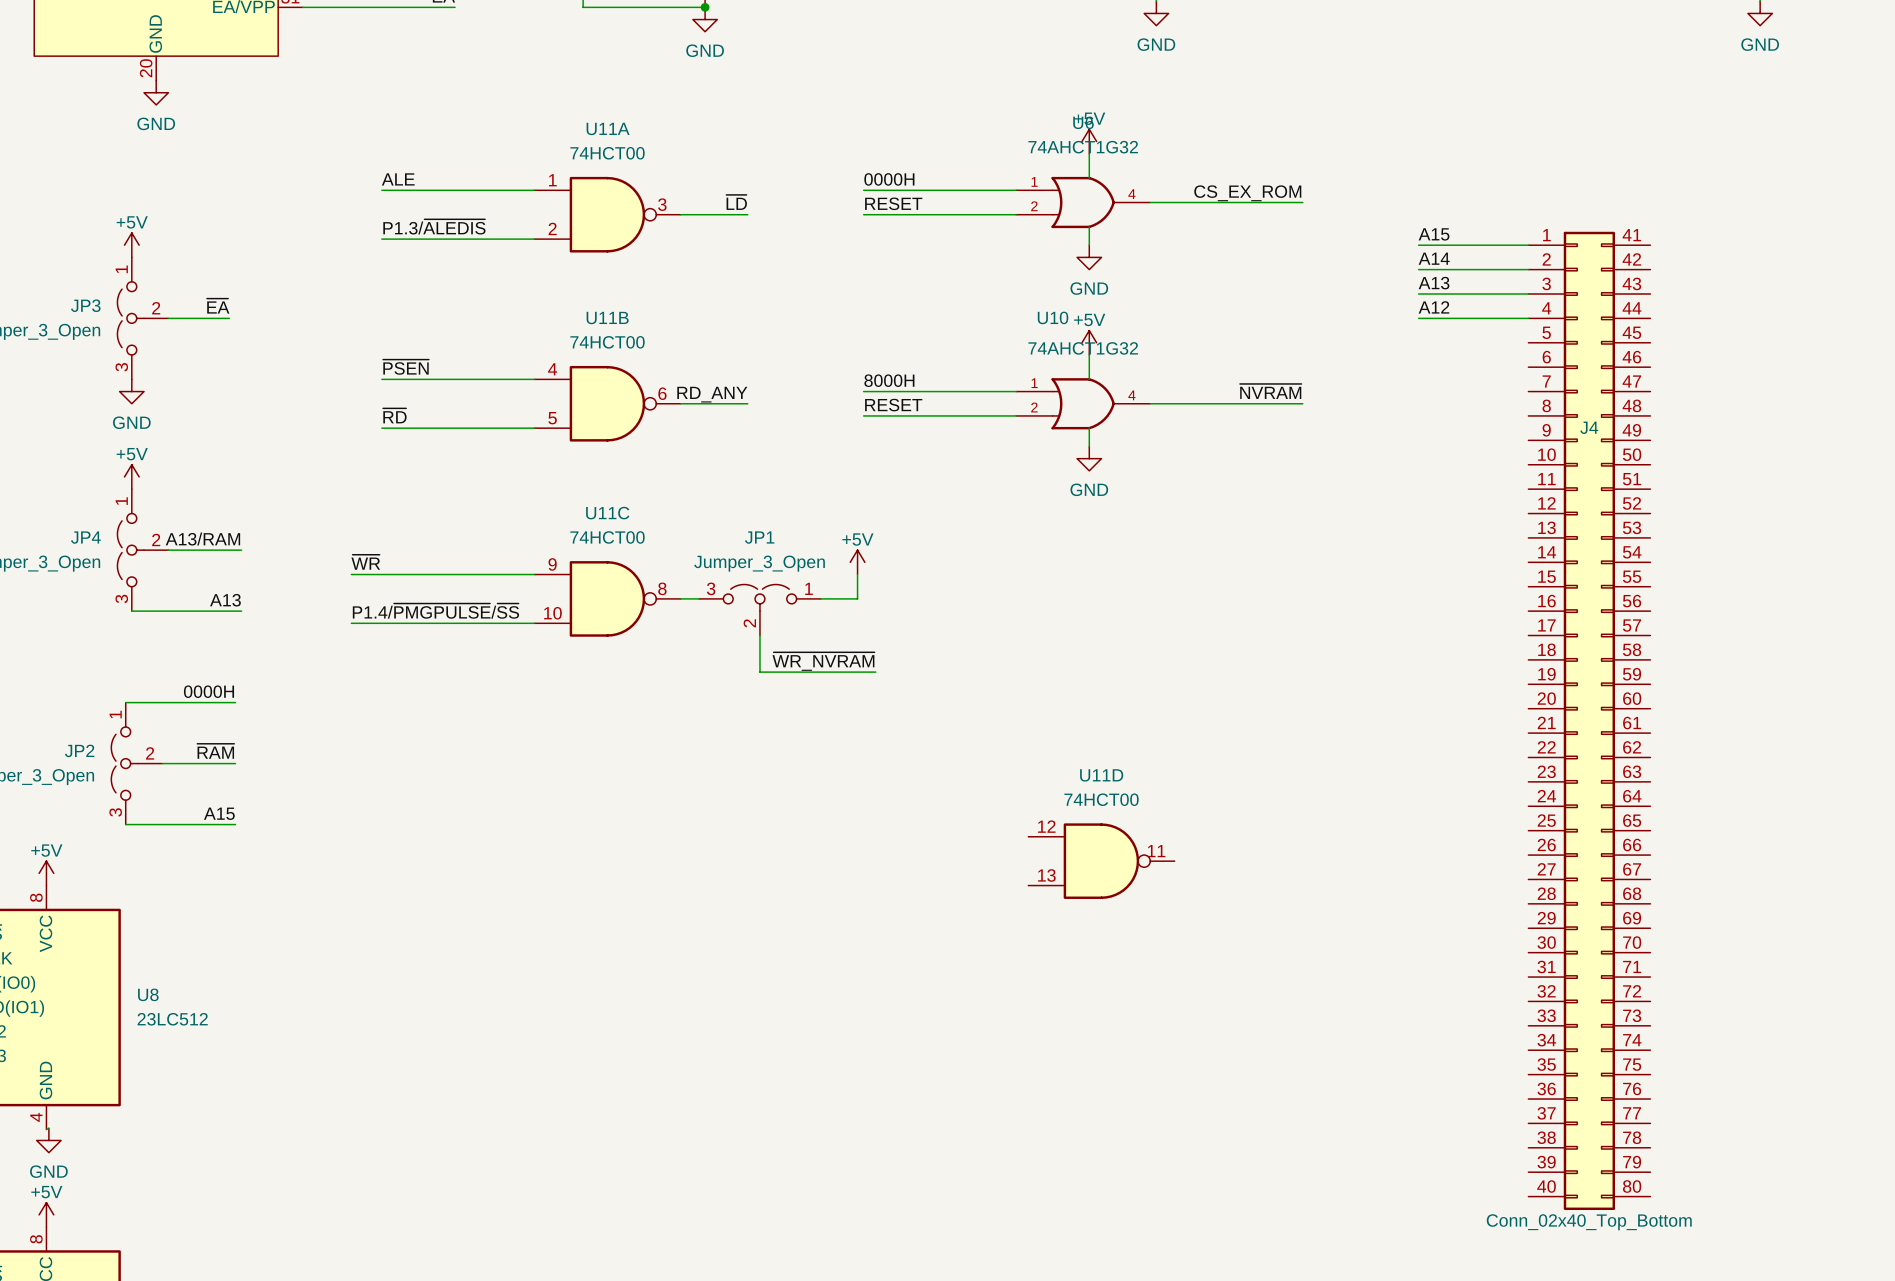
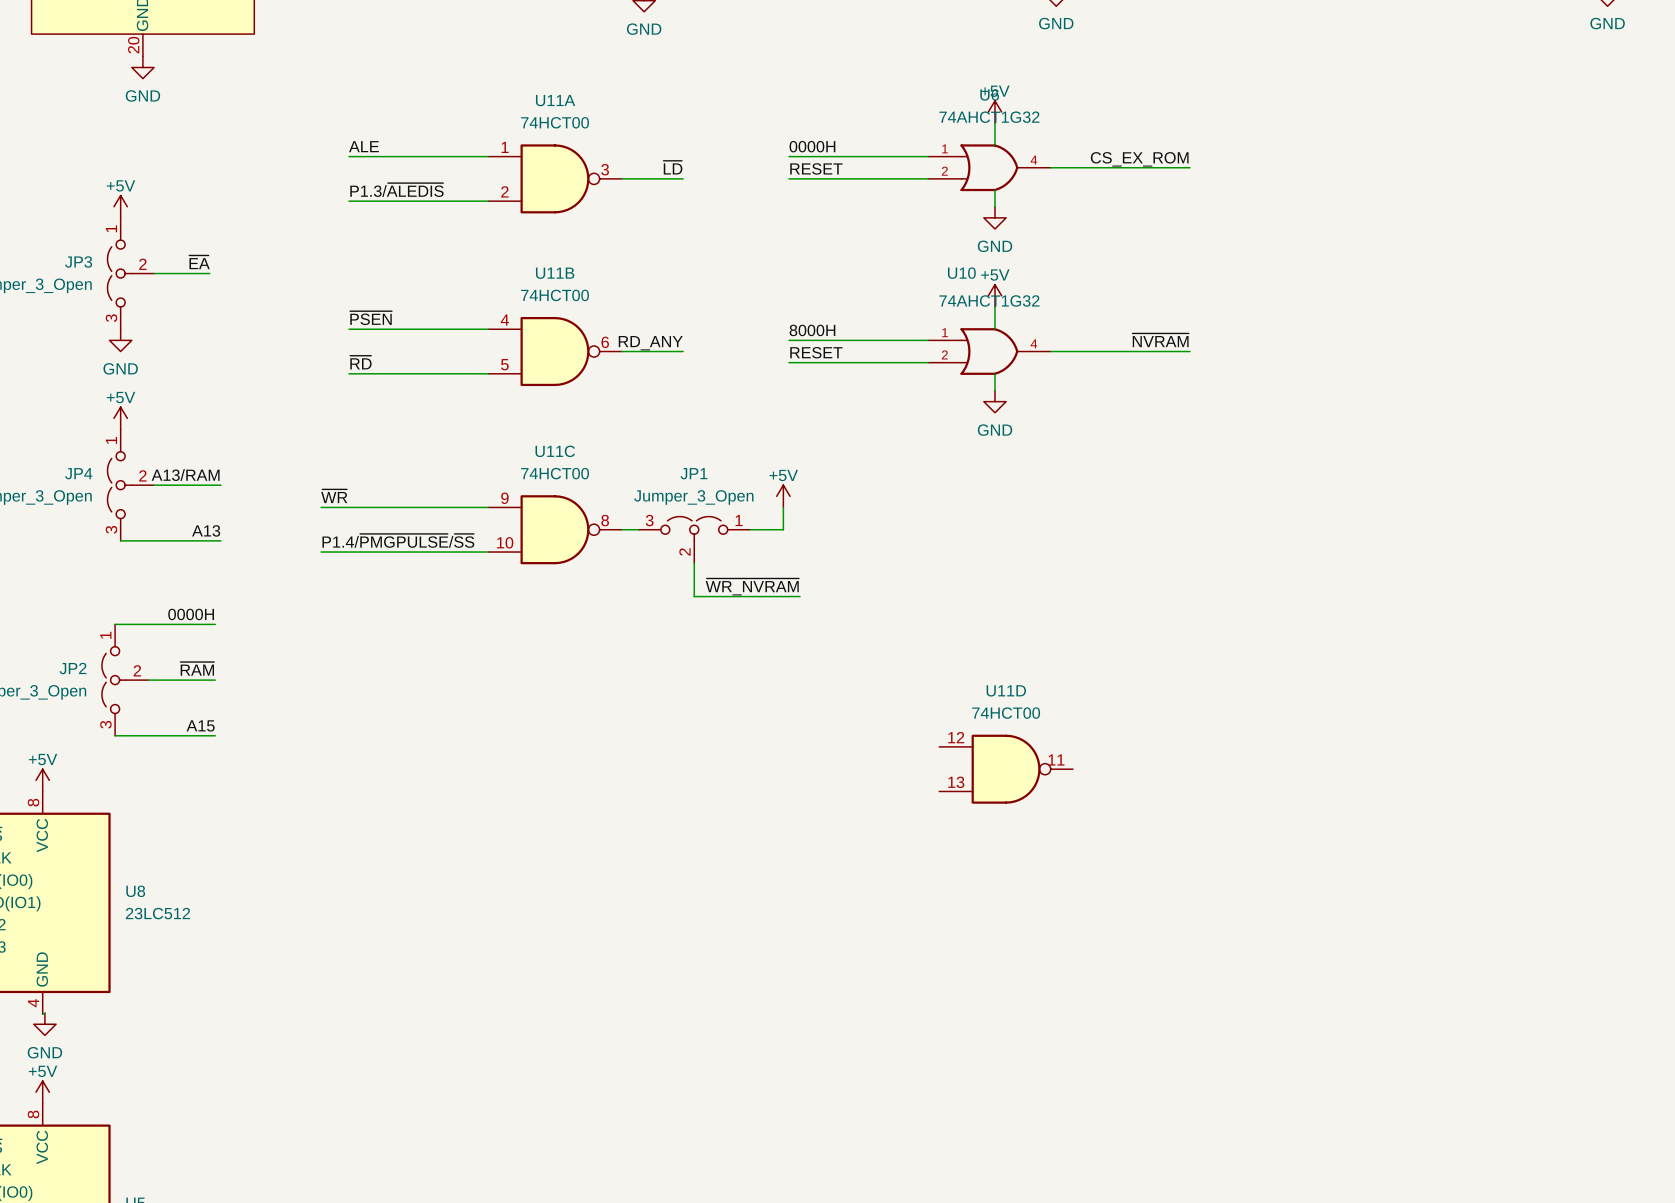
label: A15 (1434, 234) -> none
wire: (1418, 245) (1528, 245) -> none
label: A14 (1434, 258) -> none
wire: (1418, 269) (1528, 269) -> none
label: A13 (1434, 283) -> none
wire: (1418, 293) (1528, 293) -> none
label: A12 (1433, 307) -> none
wire: (1418, 318) (1528, 318) -> none
J4: Conn_02x40_Top_Bottom (1589, 720) -> none

